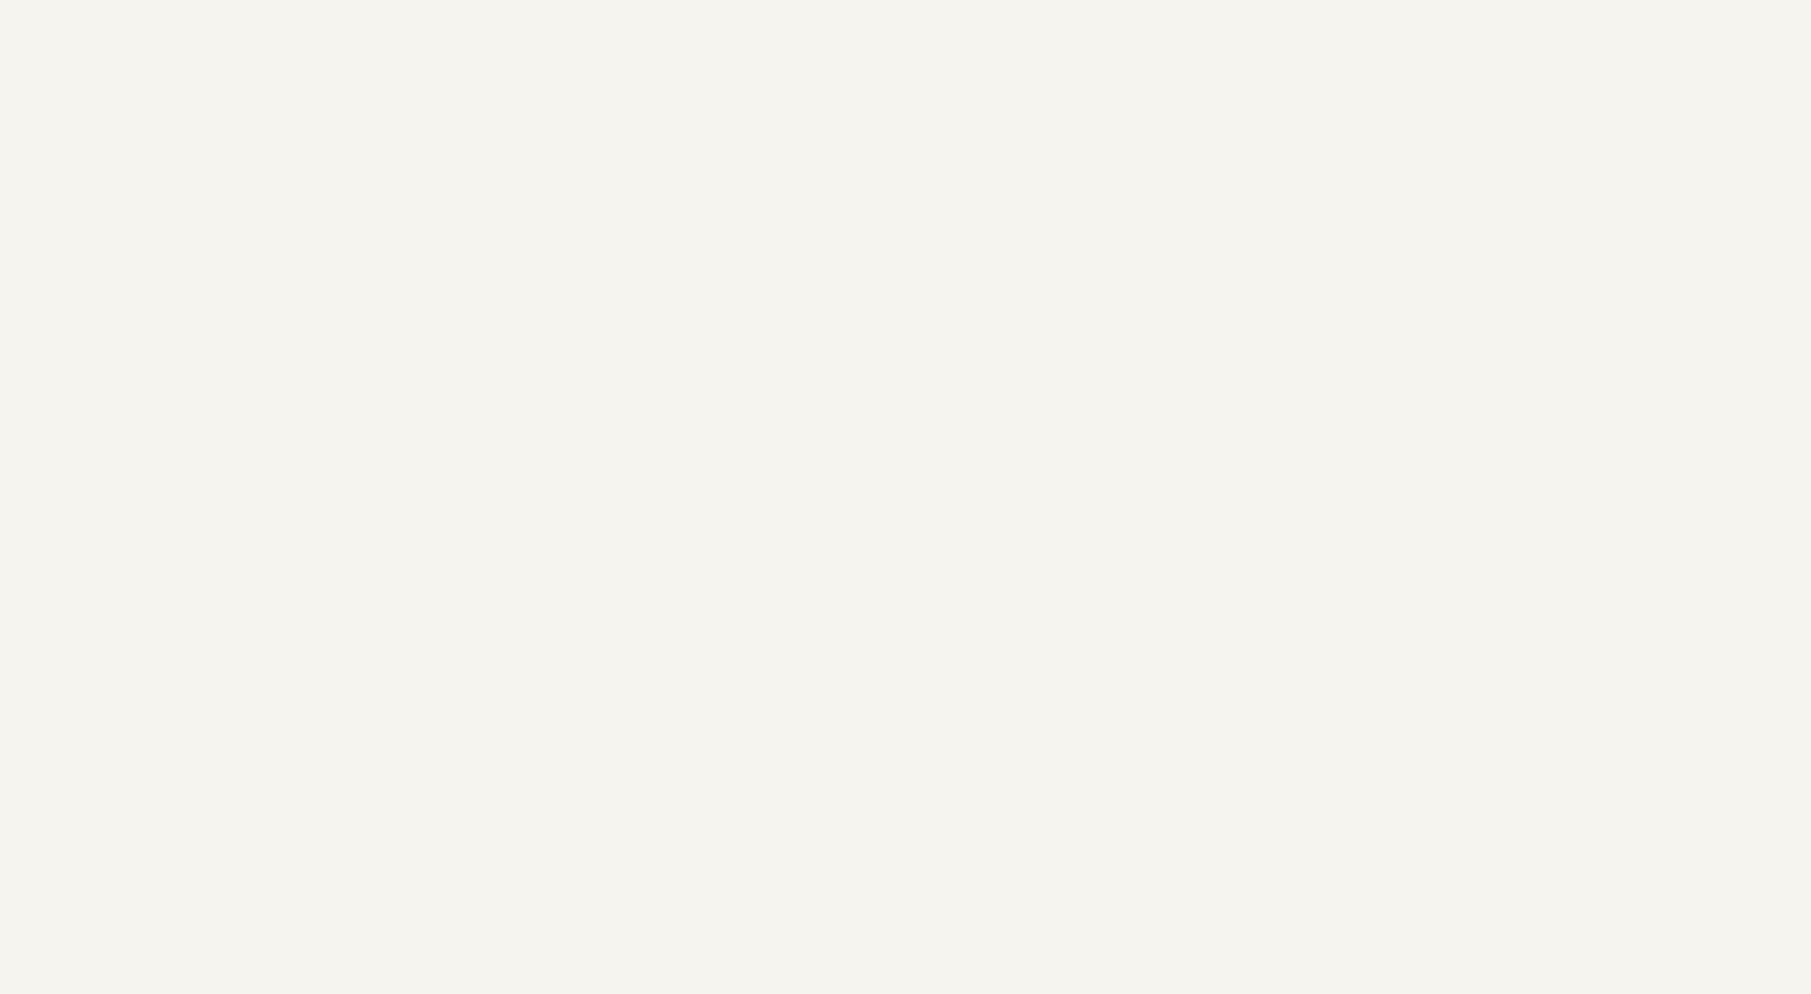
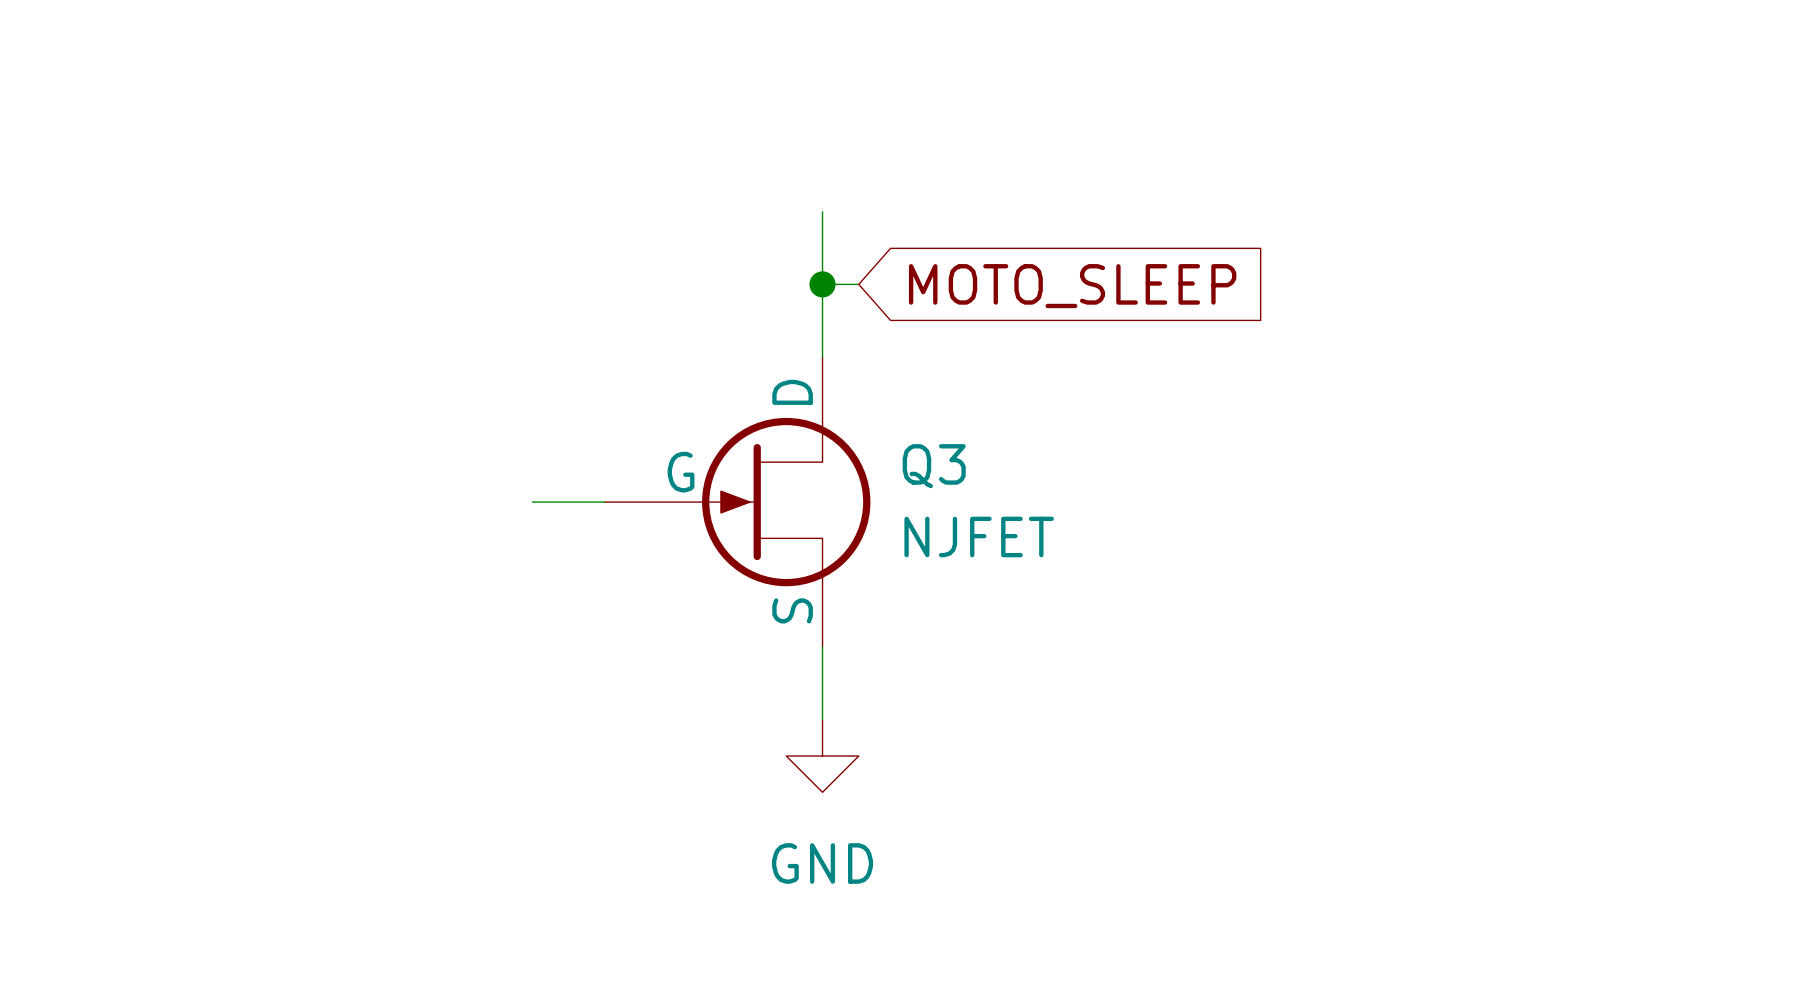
wire: none -> (822, 211) (822, 356)
wire: none -> (822, 284) (858, 284)
junction: none -> (822, 284)
global label: none -> MOTO_SLEEP (1072, 286)
wire: none -> (532, 502) (604, 502)
Q3: none -> NJFET (737, 502)
wire: none -> (822, 647) (822, 719)
power symbol: none -> GND (822, 756)

